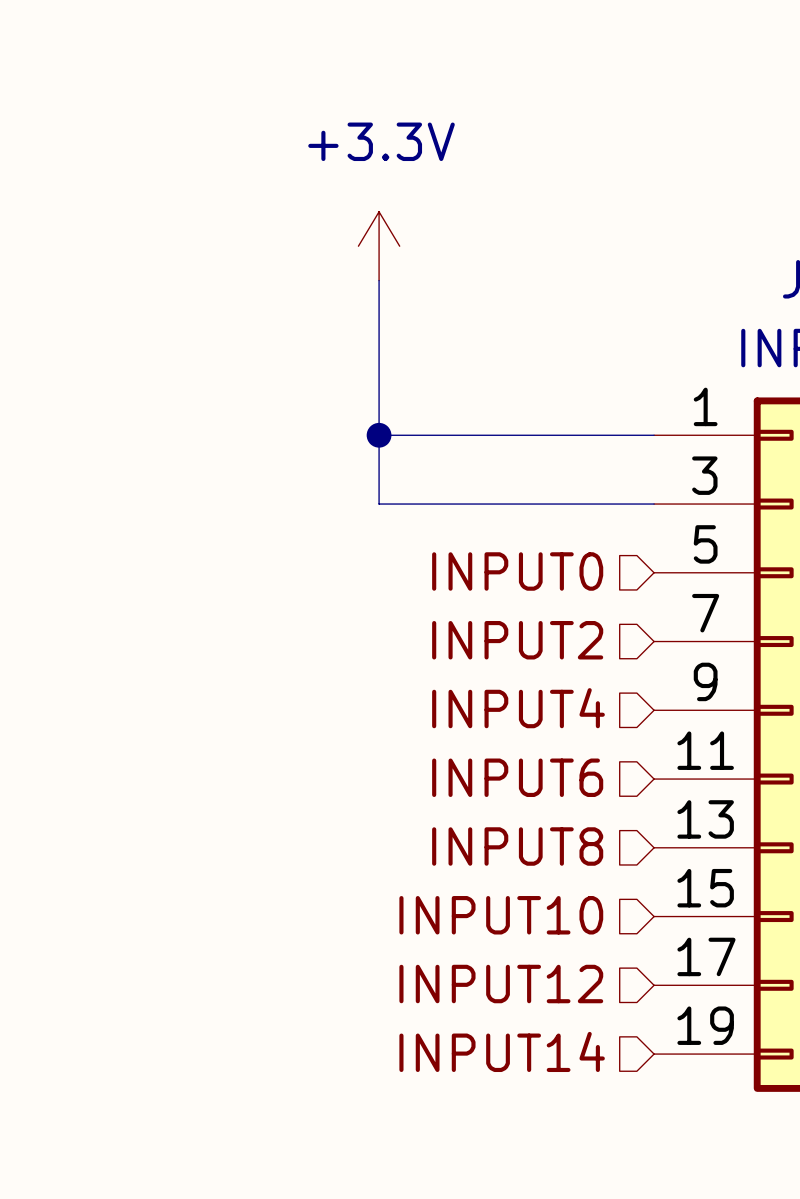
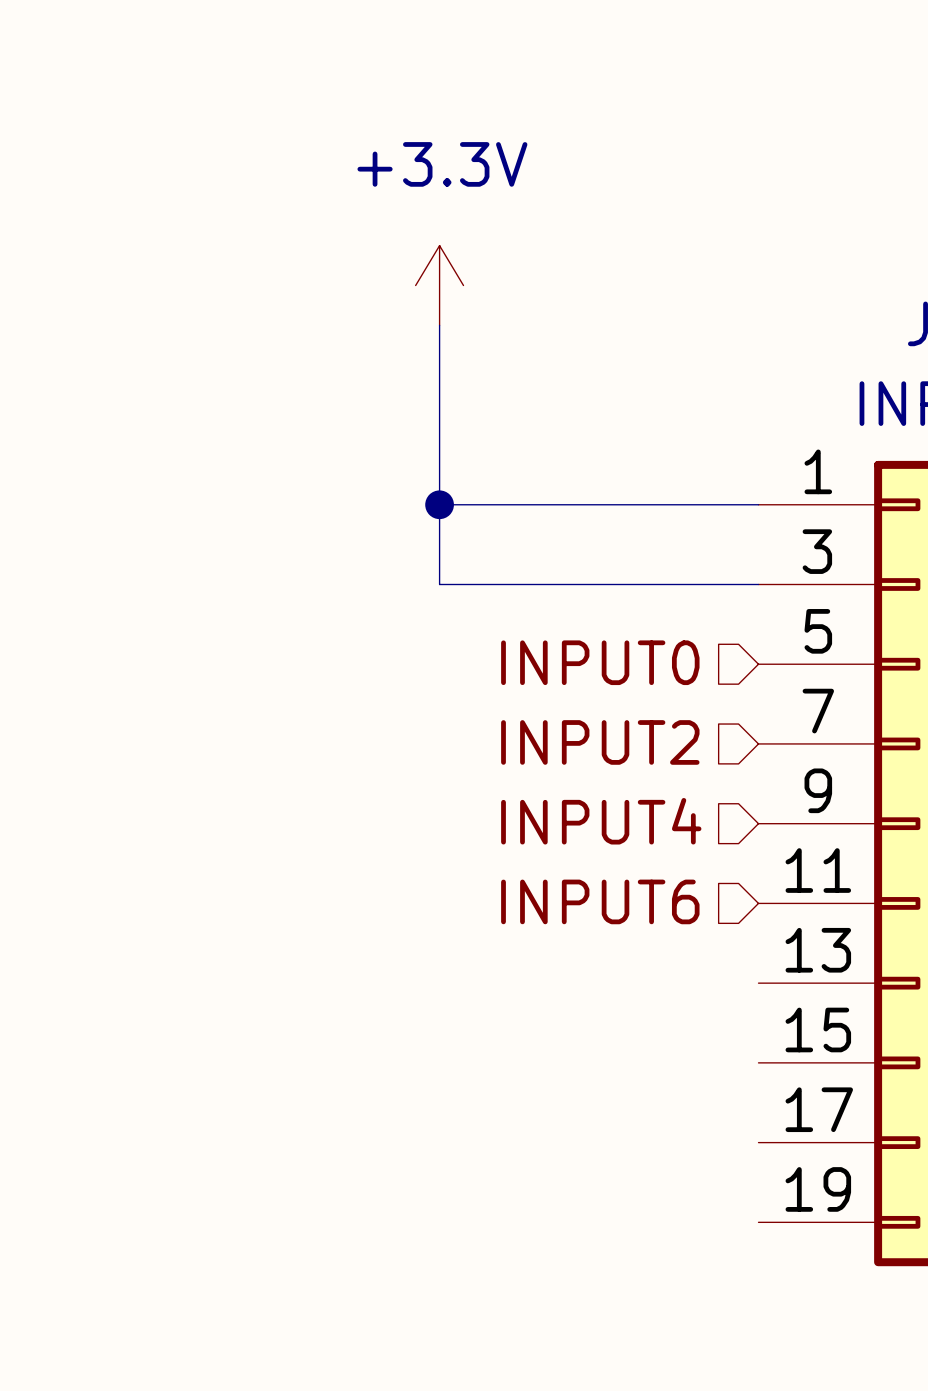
hierarchical label: INPUT8 (517, 846) -> none
hierarchical label: INPUT10 (501, 915) -> none
hierarchical label: INPUT12 (501, 984) -> none
hierarchical label: INPUT14 (502, 1051) -> none

